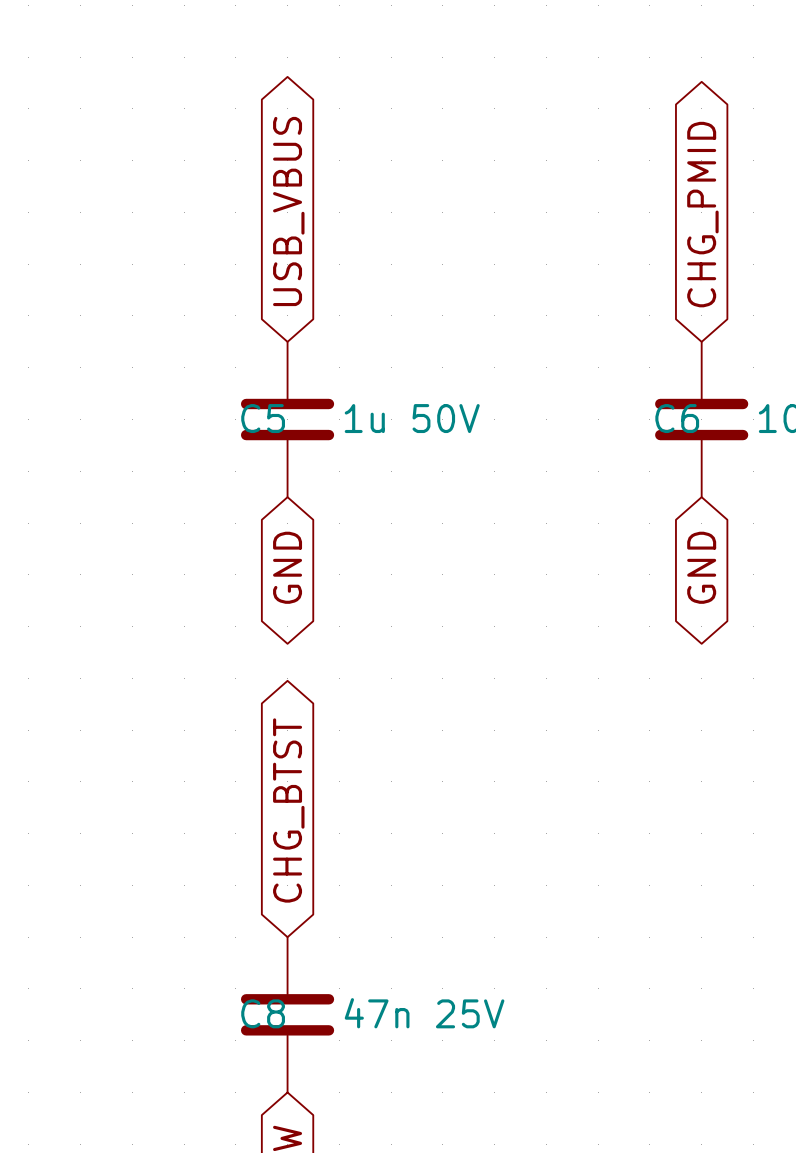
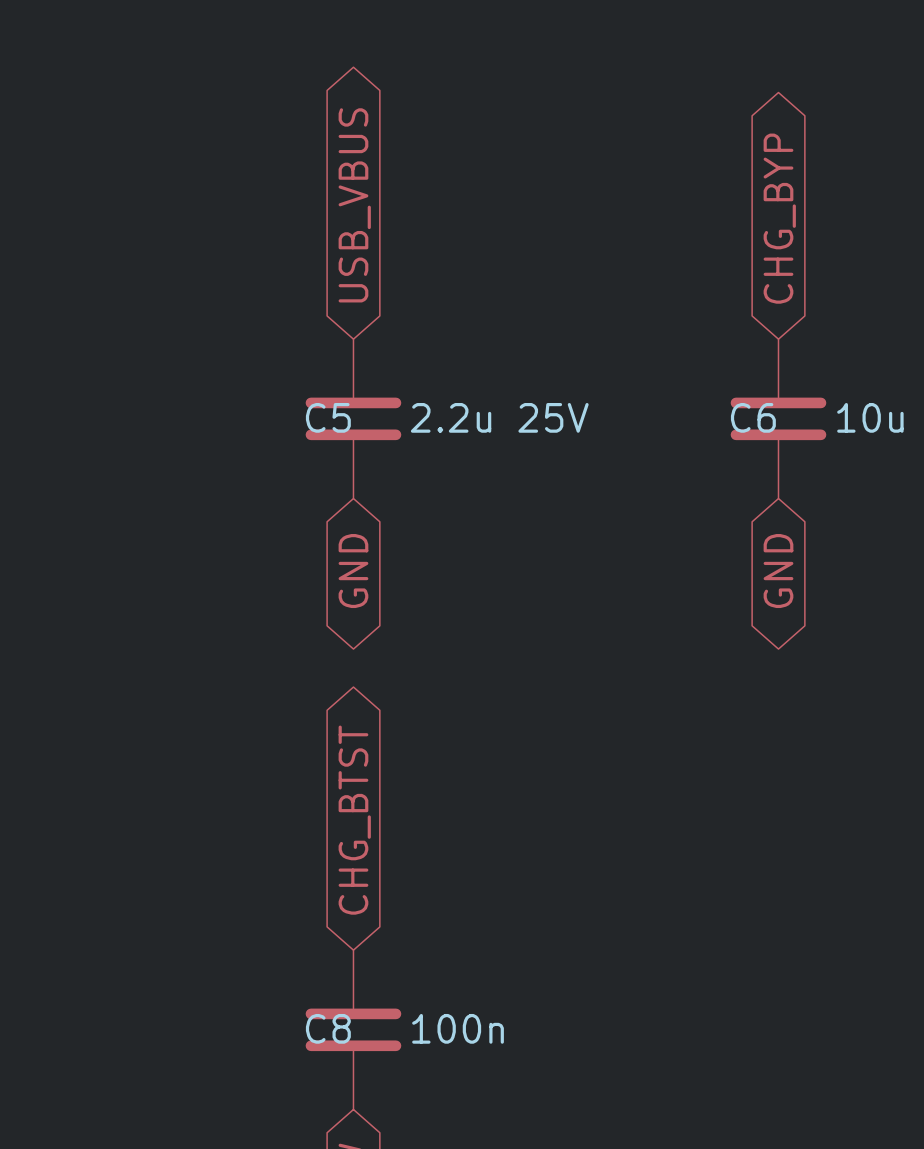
global label: CHG_PMID (702, 214) -> CHG_BYP (779, 218)
C5 value: 1u 50V (412, 418) -> 2.2u 25V (499, 417)
C8 value: 47n 25V (424, 1013) -> 100n (458, 1028)

